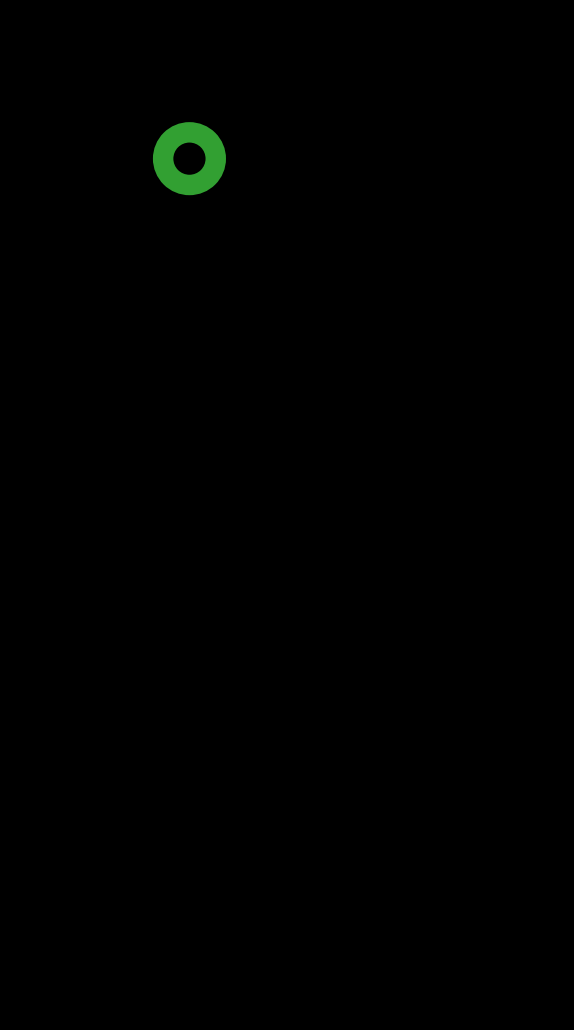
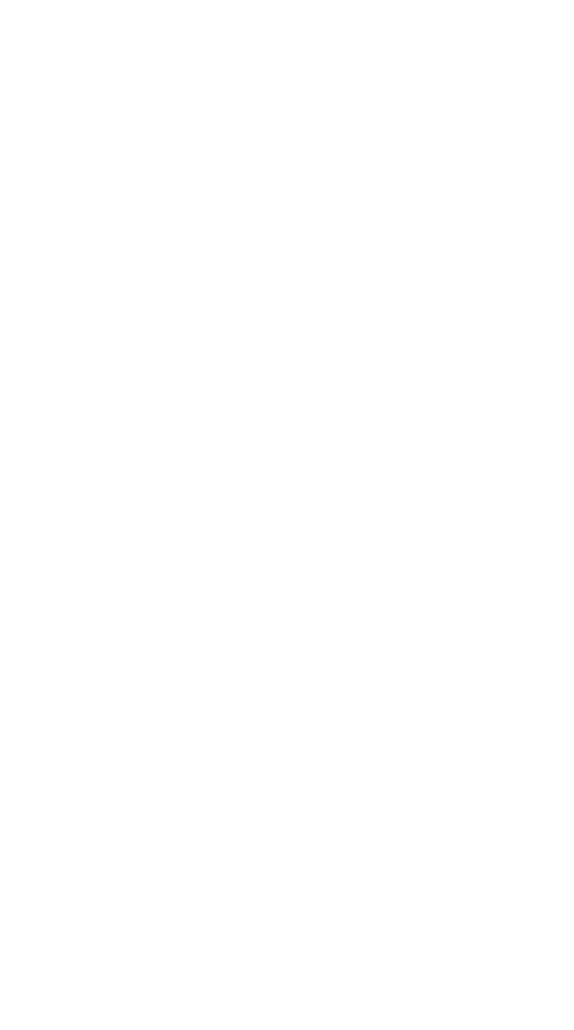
via: (189, 158) -> none

